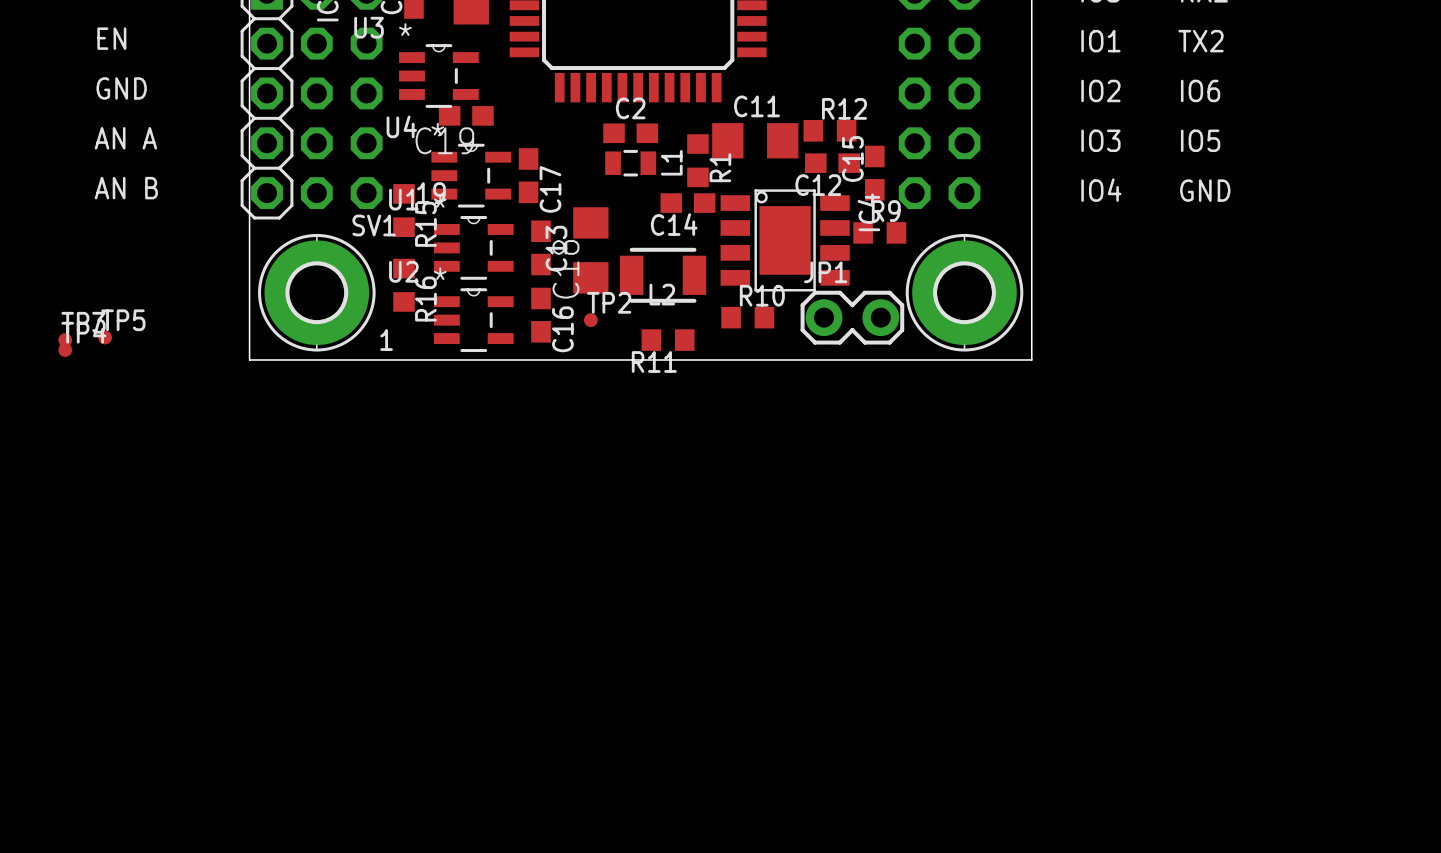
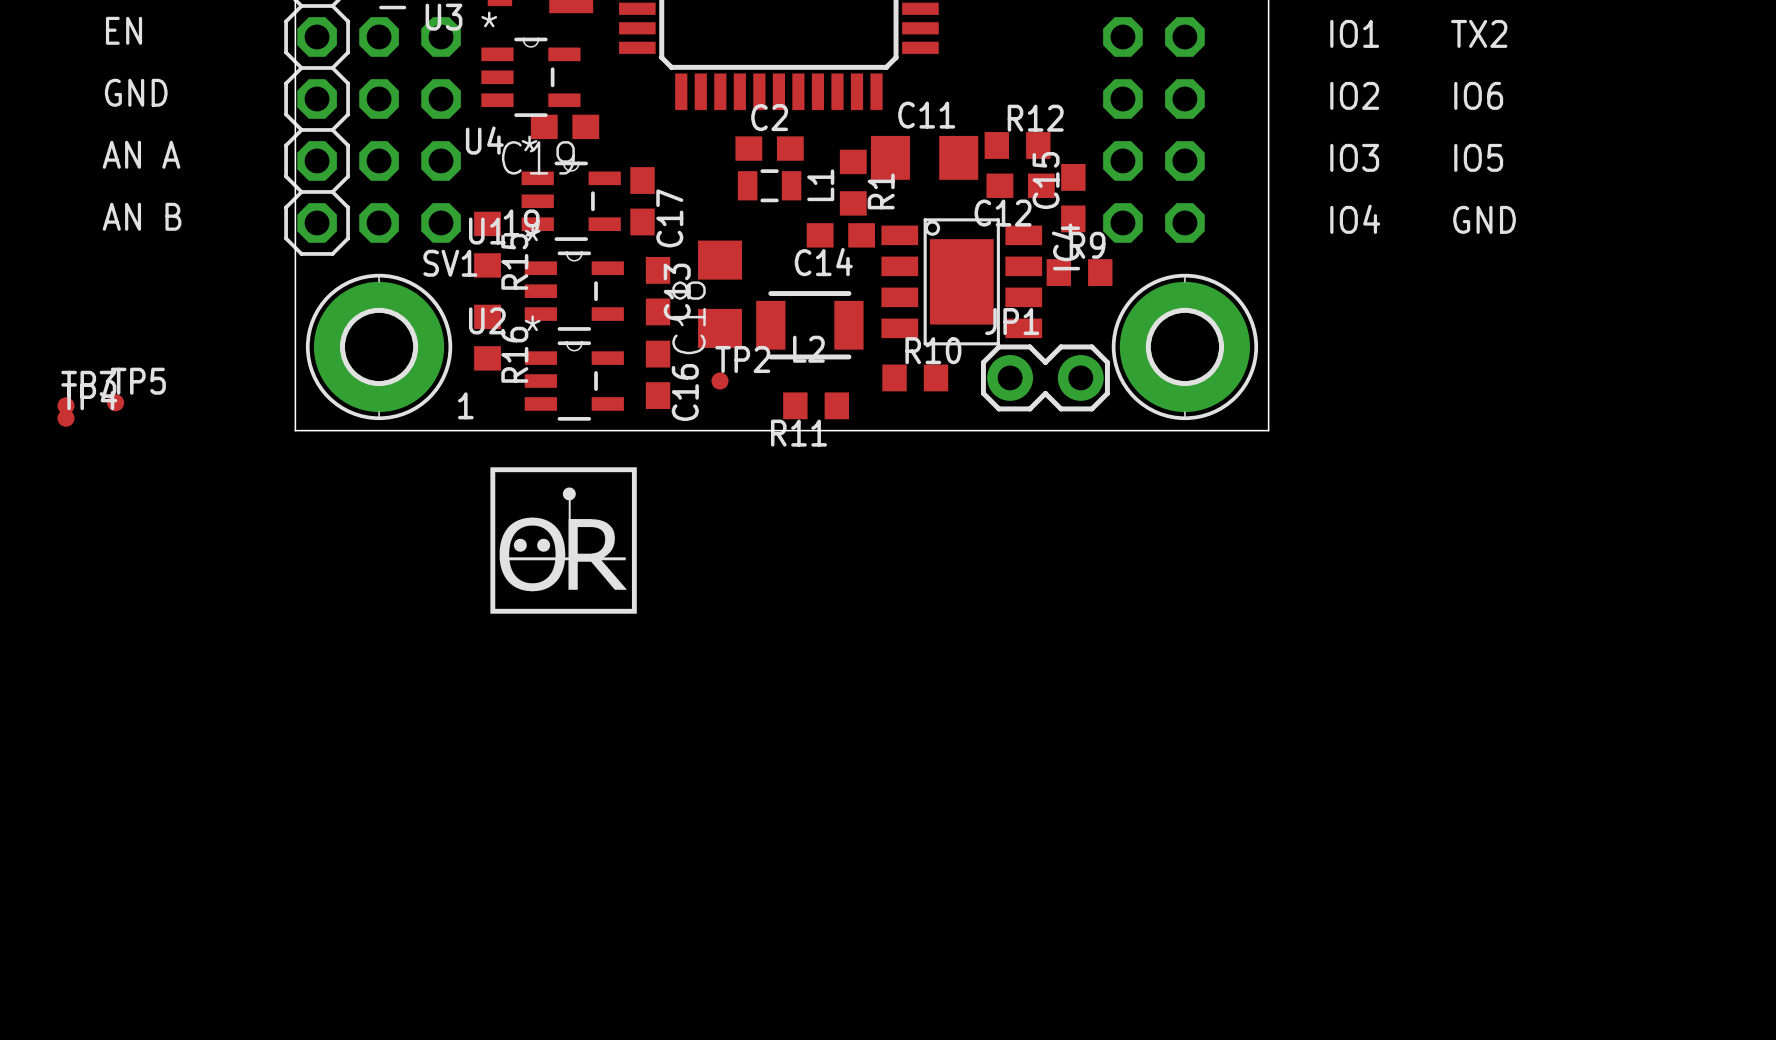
drawing: none -> [490, 467, 637, 614]

